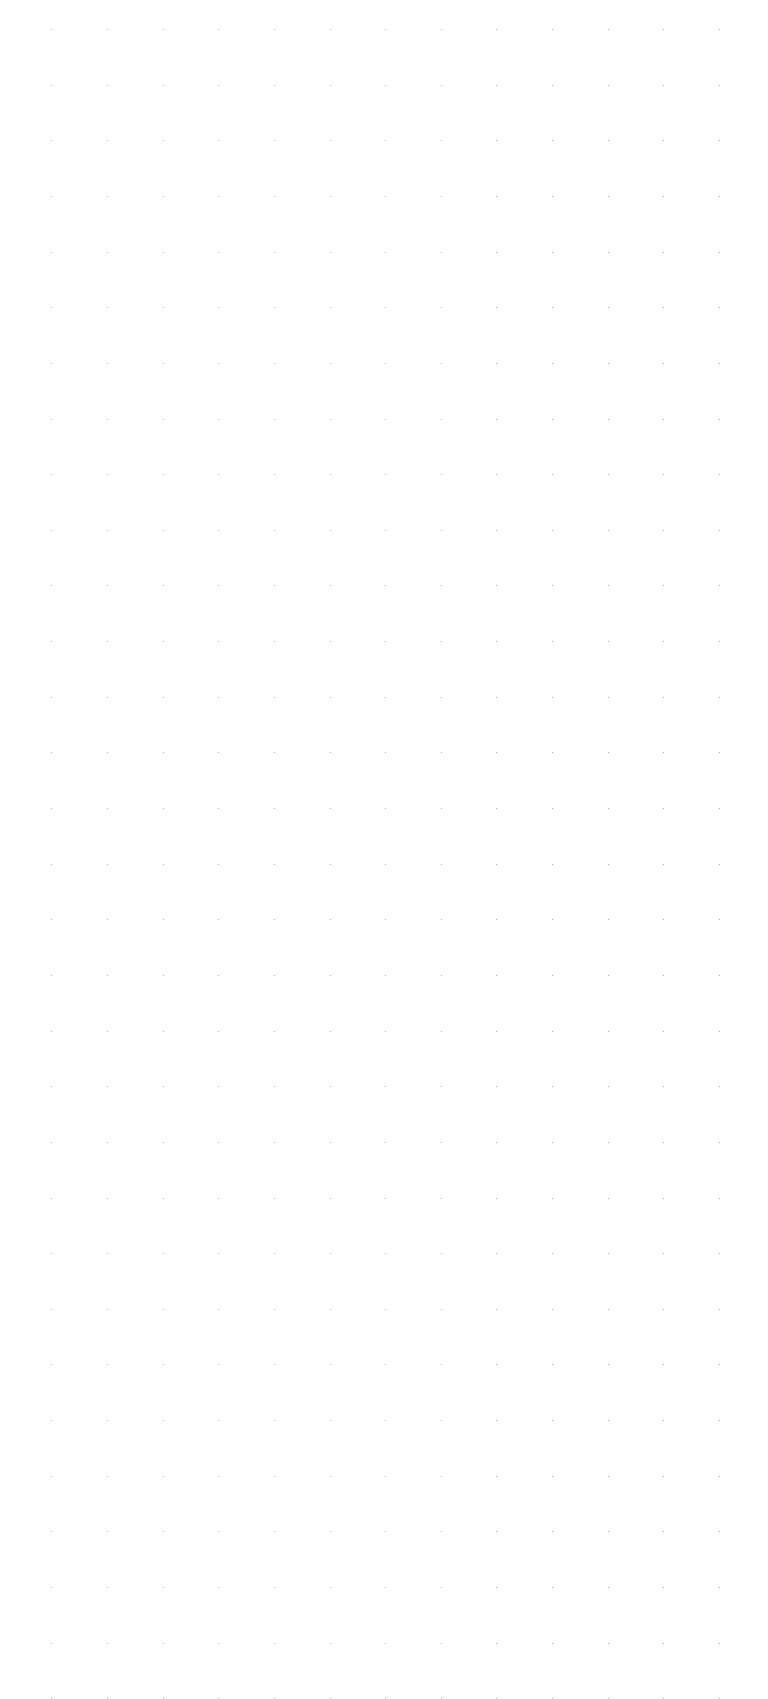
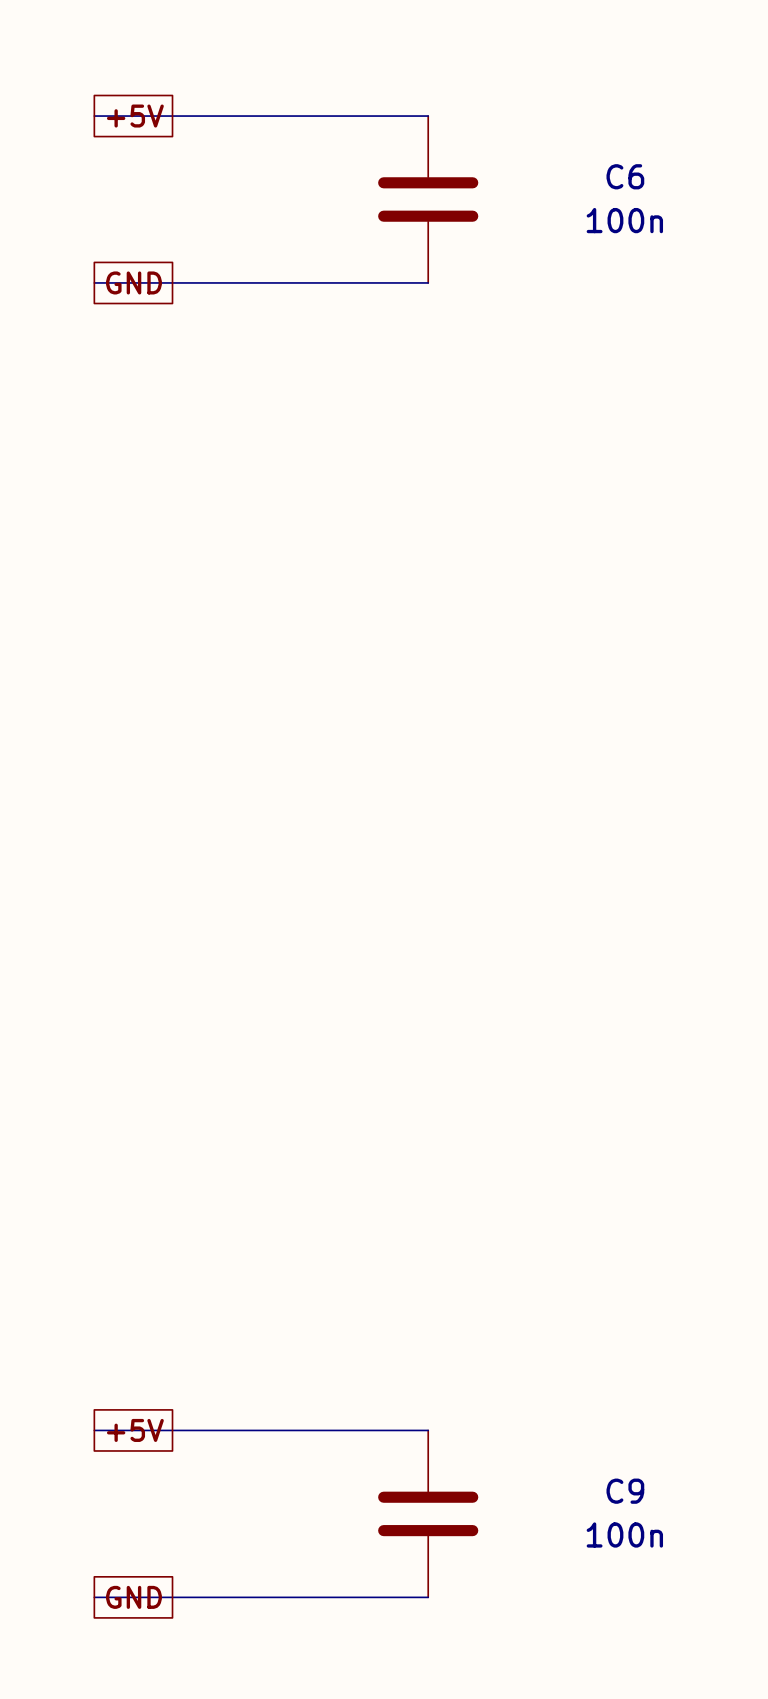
wire: none -> (94, 116) (428, 116)
global label: none -> +5V (135, 116)
C6: none -> 100n (428, 199)
wire: none -> (94, 282) (428, 282)
global label: none -> GND (133, 282)
wire: none -> (94, 1430) (428, 1430)
global label: none -> +5V (135, 1430)
C9: none -> 100n (428, 1513)
wire: none -> (94, 1597) (428, 1597)
global label: none -> GND (133, 1597)

